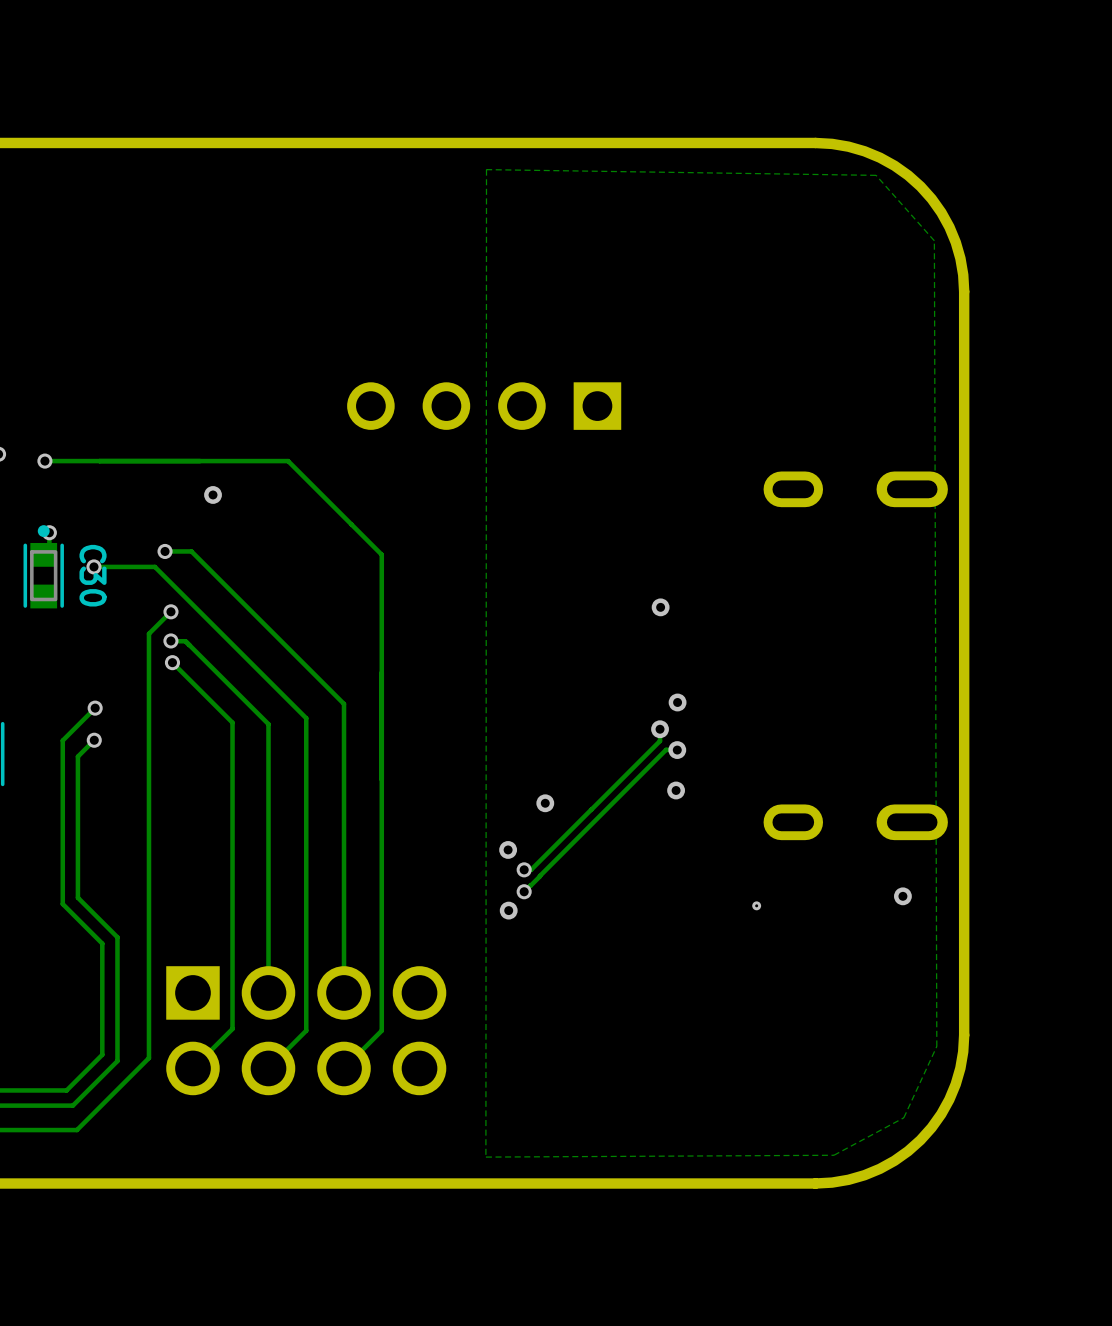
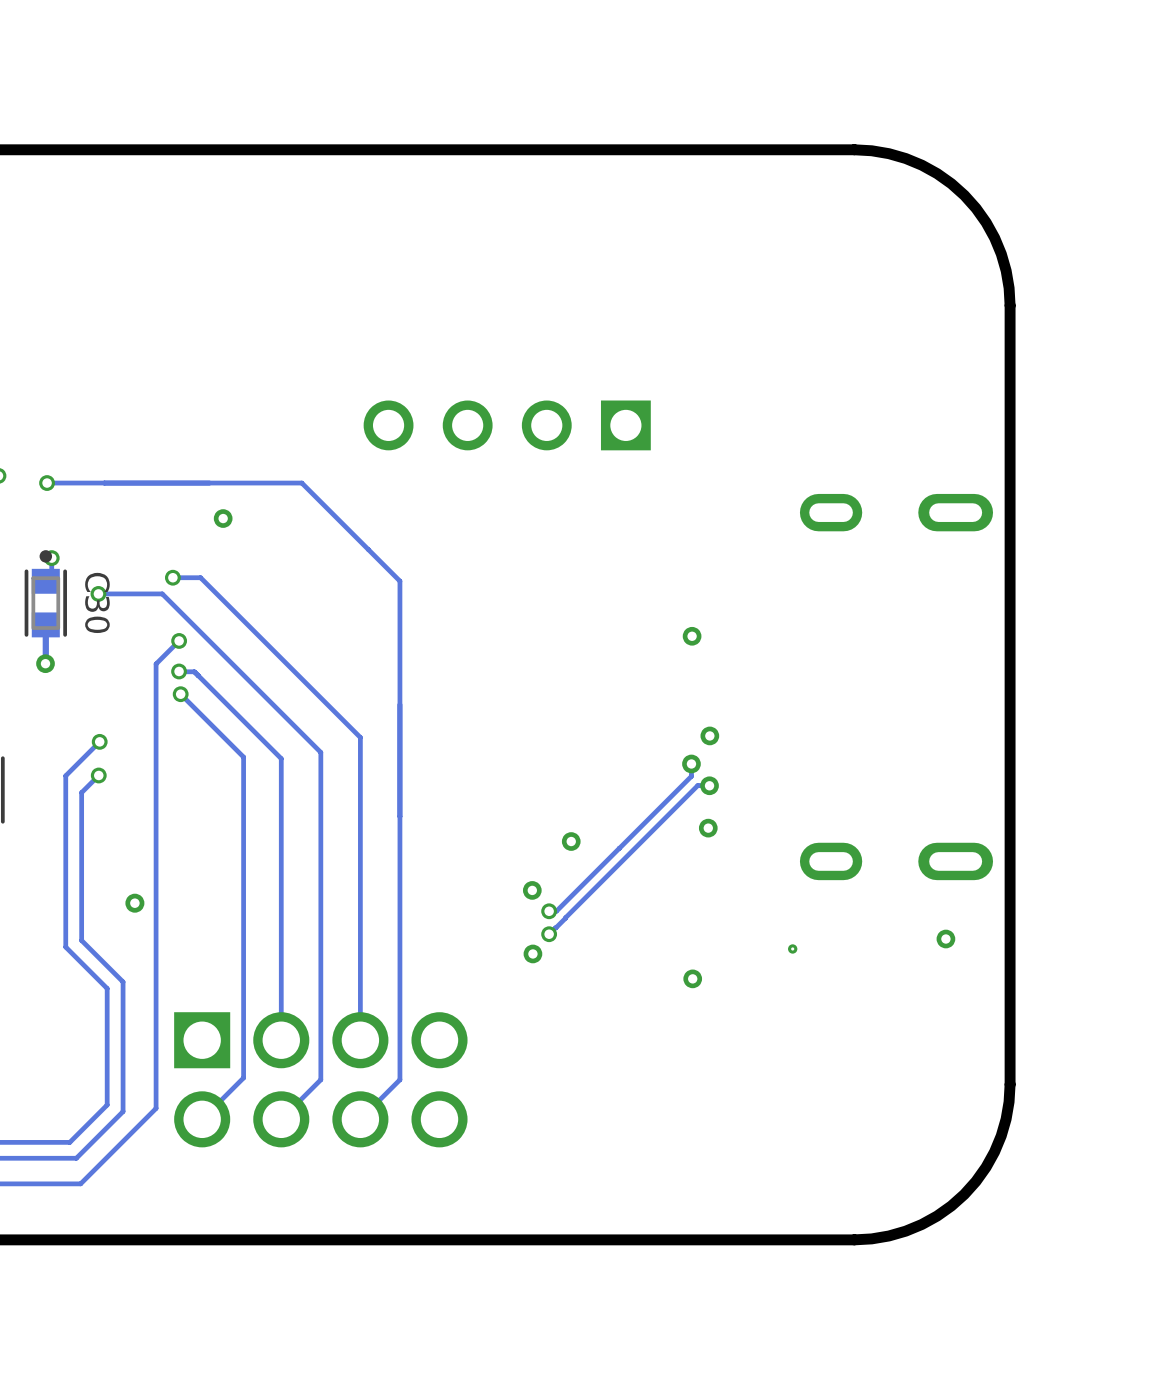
zone outline: (486, 169) (876, 175) (934, 240) (936, 1046) (903, 1117) (833, 1155) (485, 1157) (486, 169) -> none
track: none -> (45, 624) (45, 663)
via: none -> (45, 663)
via: none -> (134, 903)
via: none -> (692, 978)

